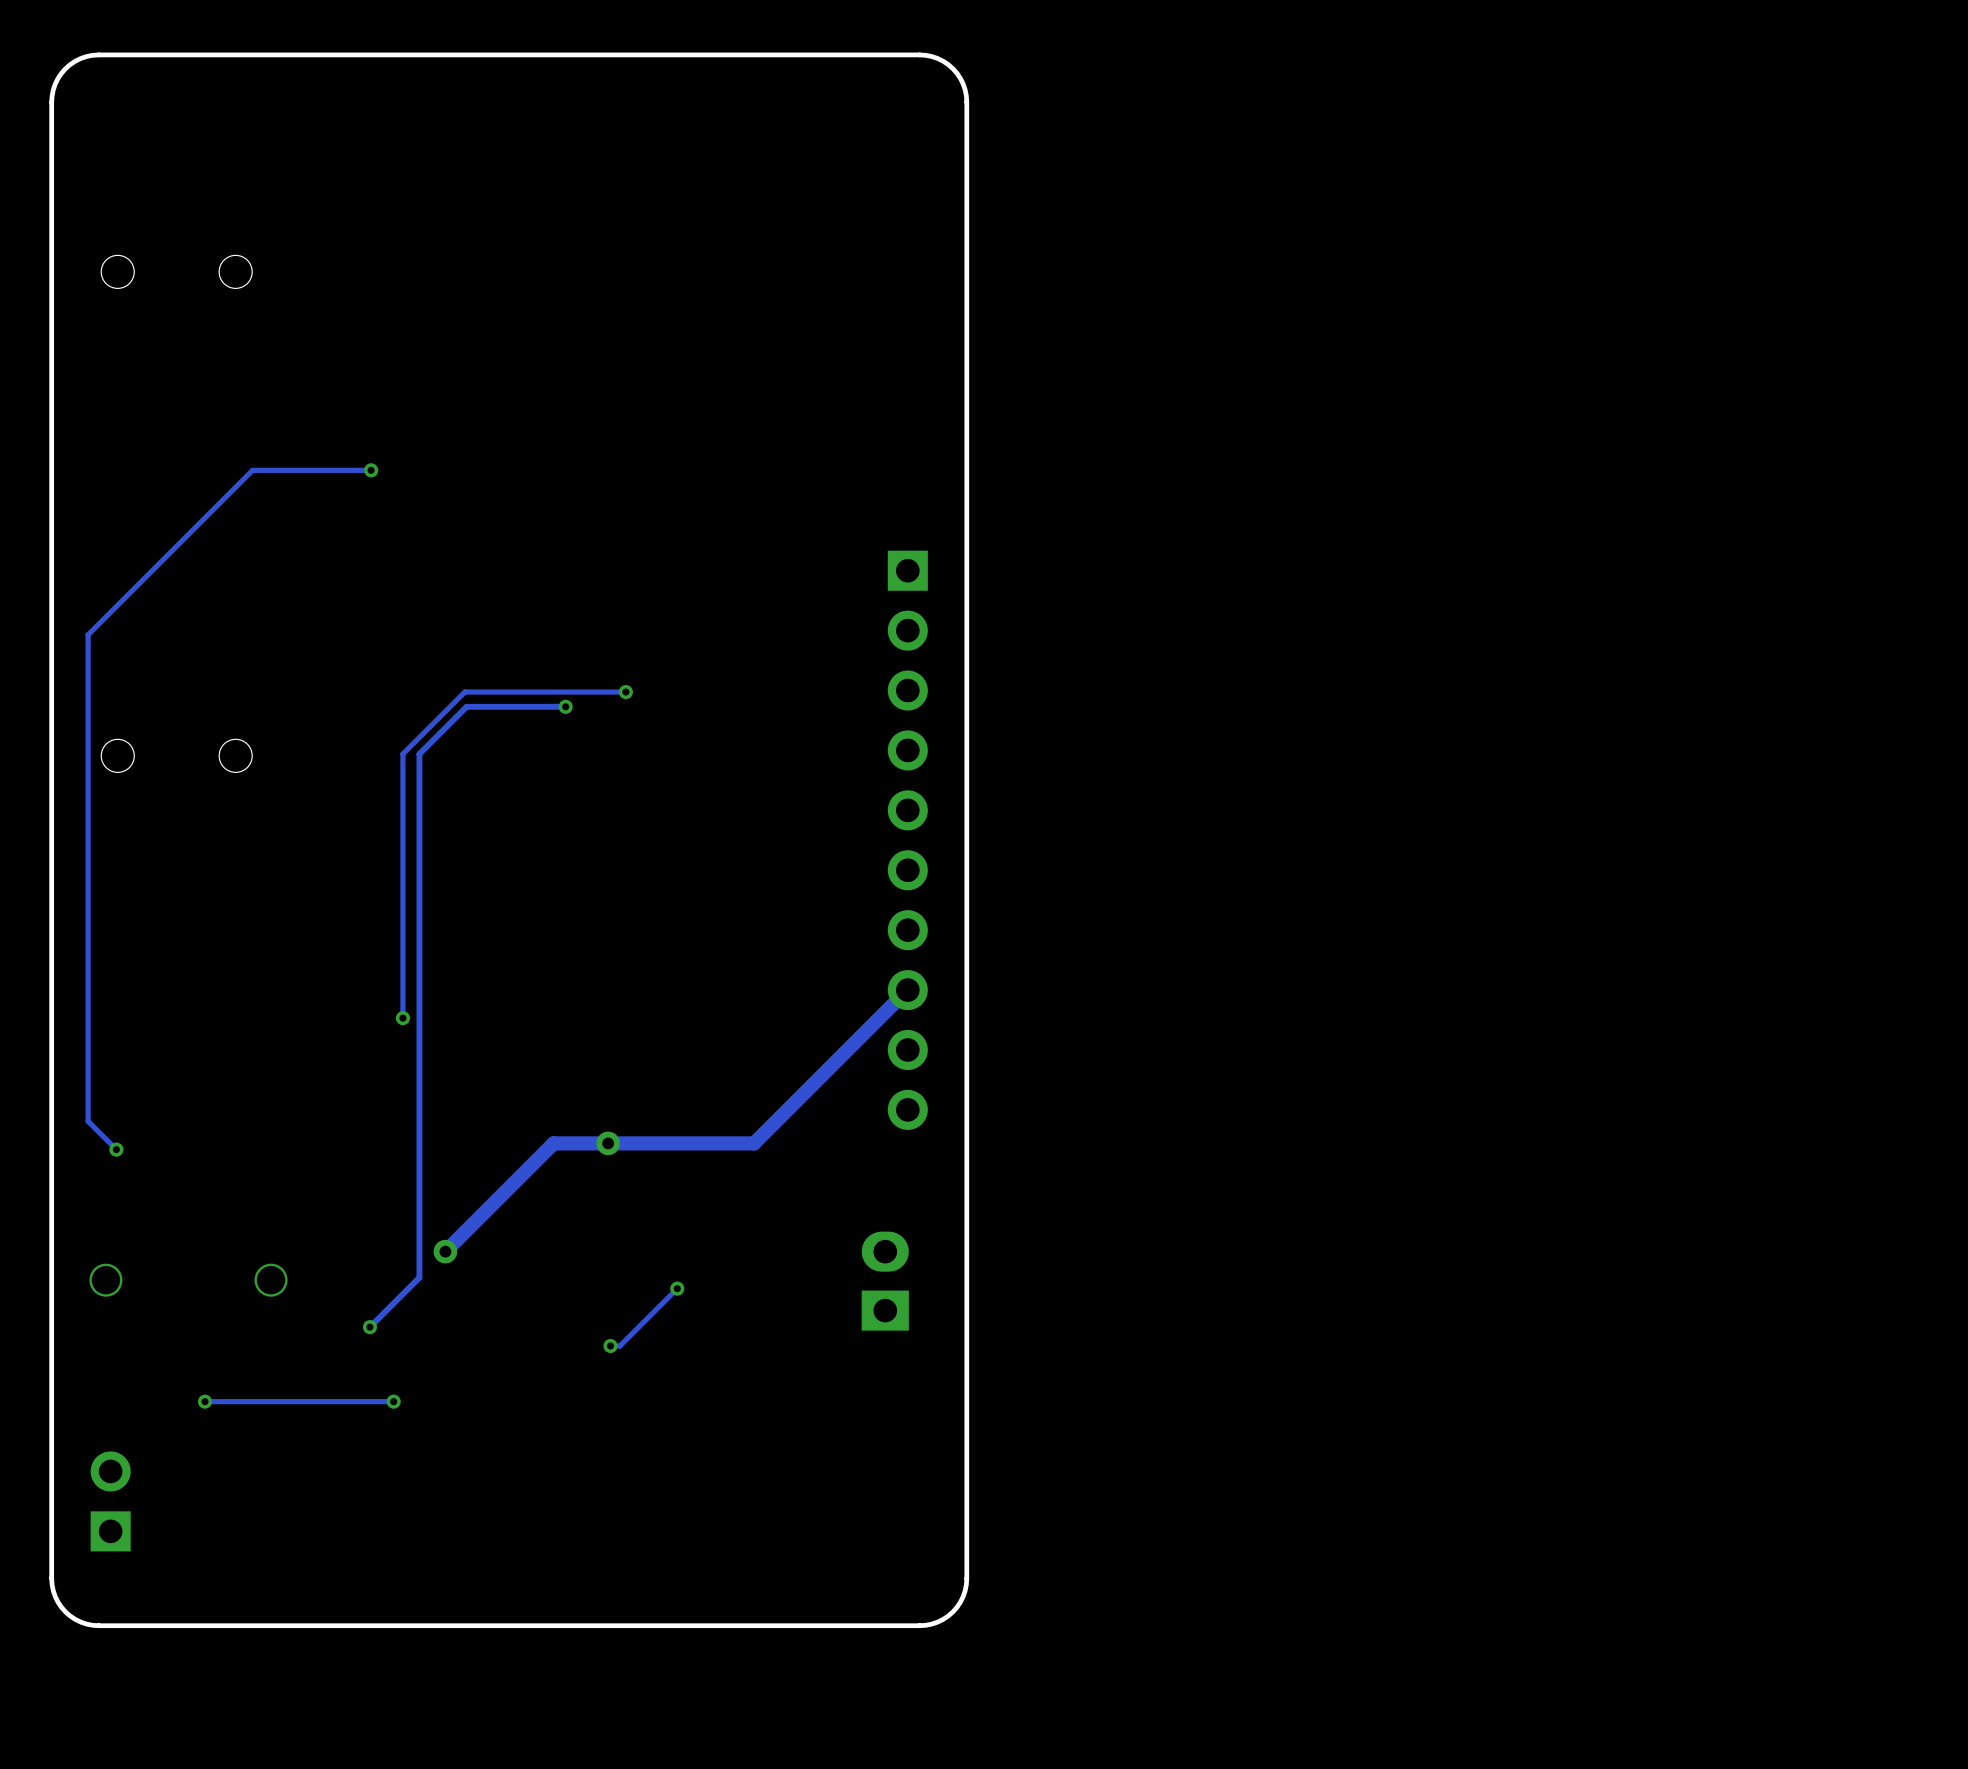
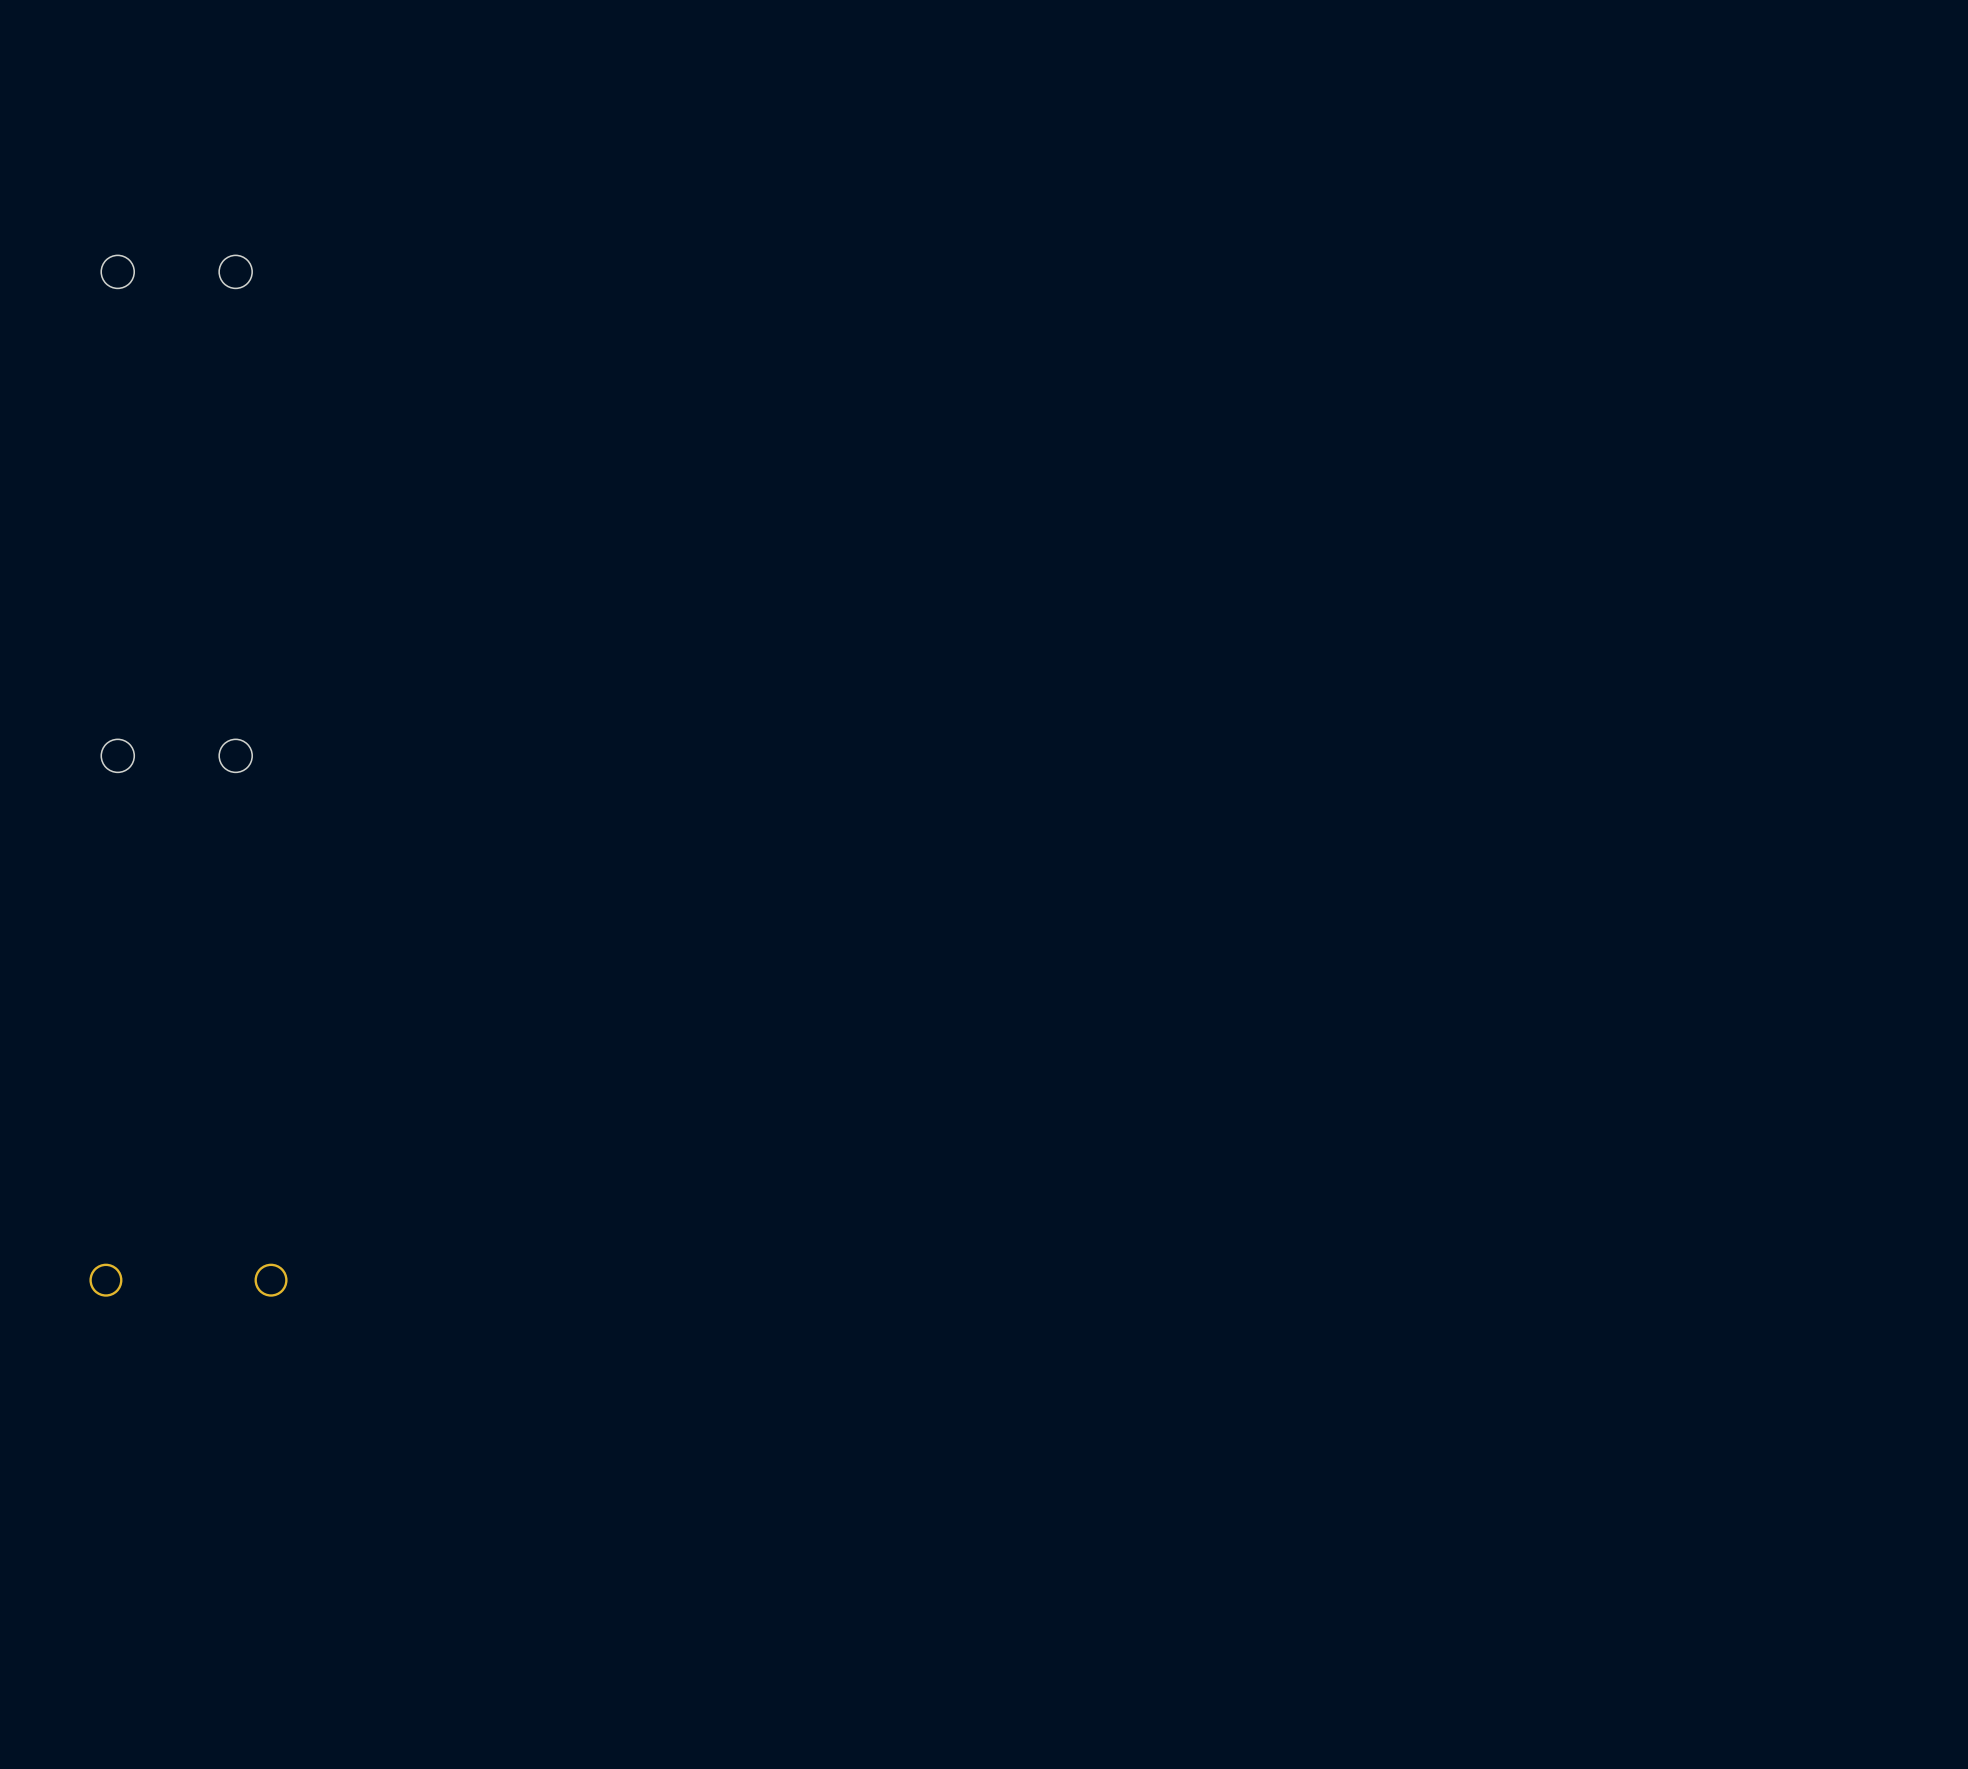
board edge: (919, 54) (98, 54) (86, 56) (75, 61) (65, 68) (58, 78) (53, 89) (51, 102) (51, 1578) (53, 1590) (58, 1602) (65, 1611) (75, 1619) (86, 1624) (98, 1625) (919, 1625) (931, 1624) (943, 1619) (952, 1611) (960, 1602) (965, 1590) (966, 1578) (966, 102) (963, 84) (952, 68) (937, 58) (919, 54) -> none
track: (371, 470) (252, 470) (88, 634) (88, 1121) (116, 1149) -> none
via: (371, 470) -> none
track: (625, 692) (464, 692) (402, 753) (402, 1018) -> none
via: (625, 692) -> none
track: (565, 706) (466, 706) (419, 753) (419, 1277) (369, 1327) -> none
via: (565, 706) -> none
part: (907, 840) -> none
track: (907, 990) (754, 1143) (553, 1143) (445, 1251) -> none
via: (402, 1018) -> none
via: (608, 1143) -> none
via: (116, 1149) -> none
via: (445, 1251) -> none
part: (885, 1281) -> none
track: (677, 1288) (619, 1345) (610, 1345) -> none
via: (677, 1288) -> none
via: (369, 1327) -> none
via: (610, 1345) -> none
via: (204, 1401) -> none
track: (393, 1401) (204, 1401) -> none
via: (393, 1401) -> none
part: (110, 1501) -> none

